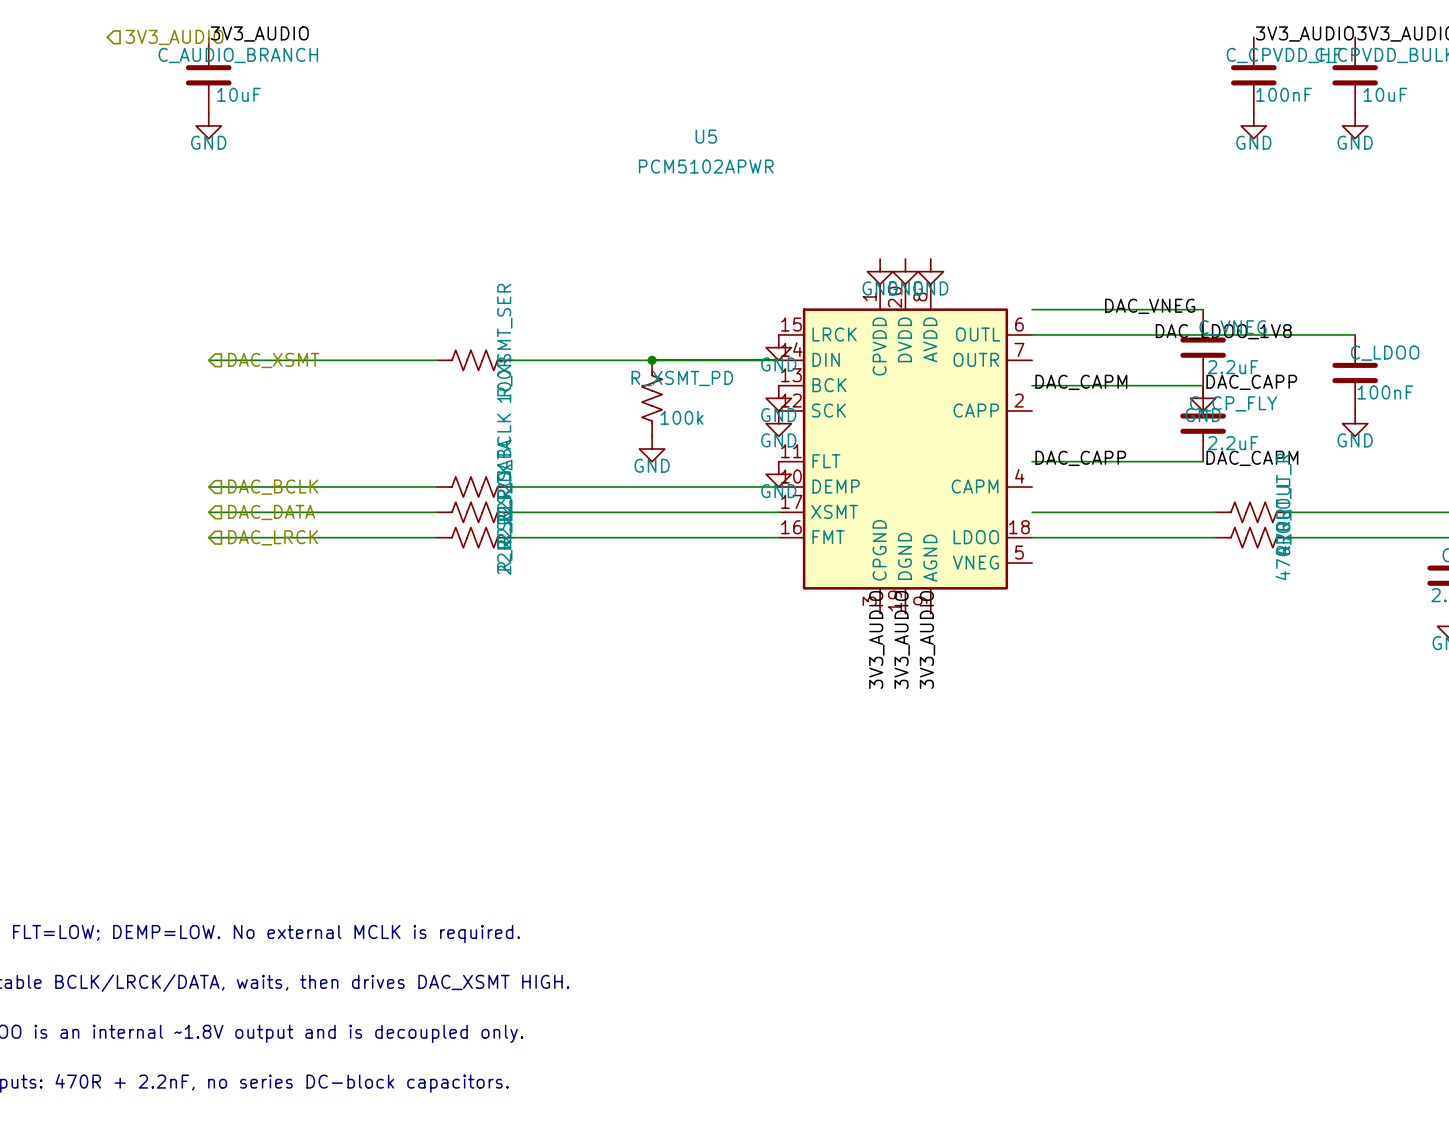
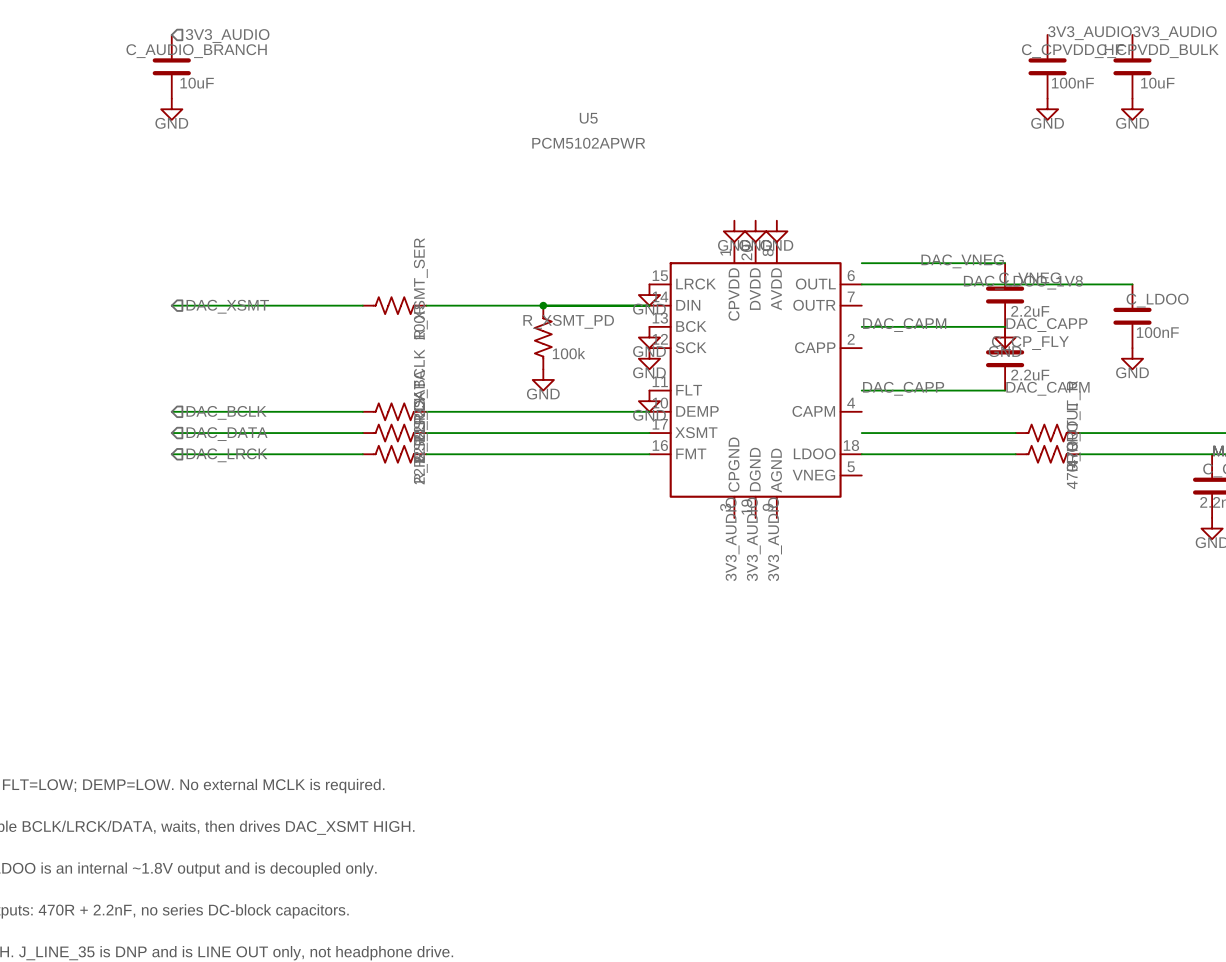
label: 3V3_AUDIO (259, 34) -> none
hierarchical label position: 3V3_AUDIO (174, 37) -> 3V3_AUDIO (227, 36)

